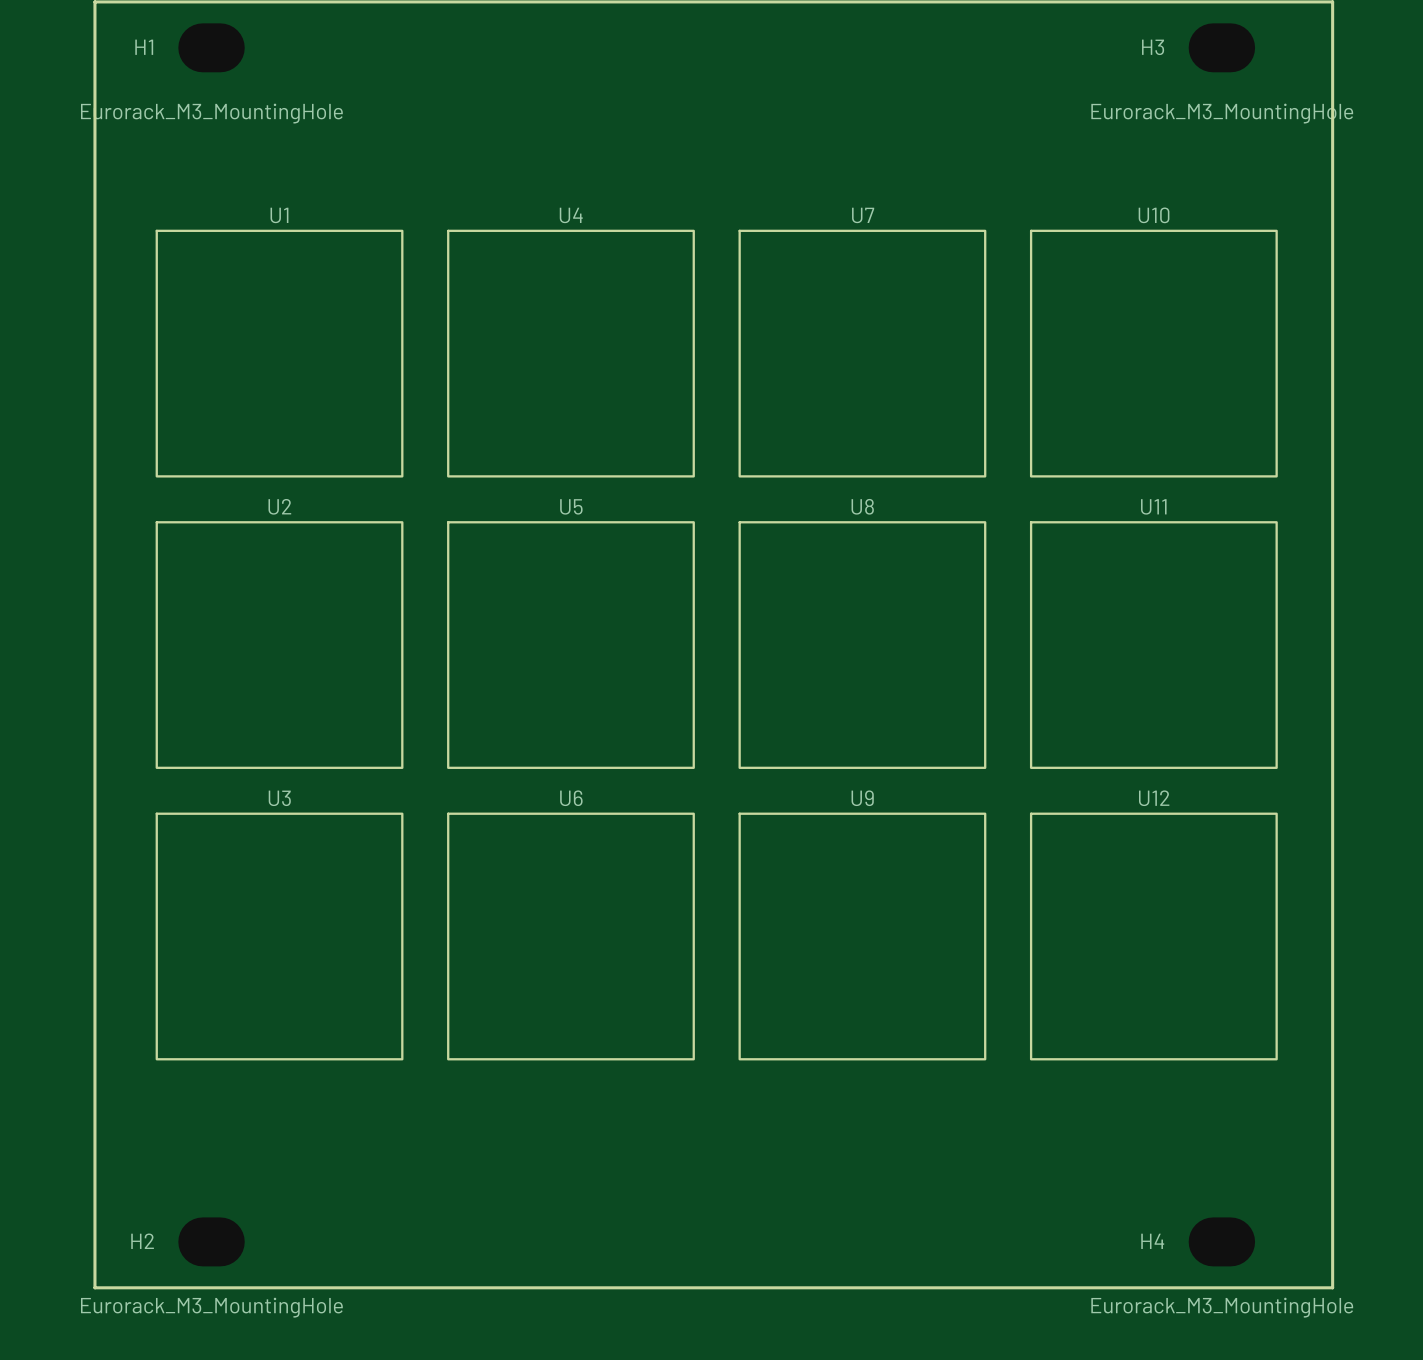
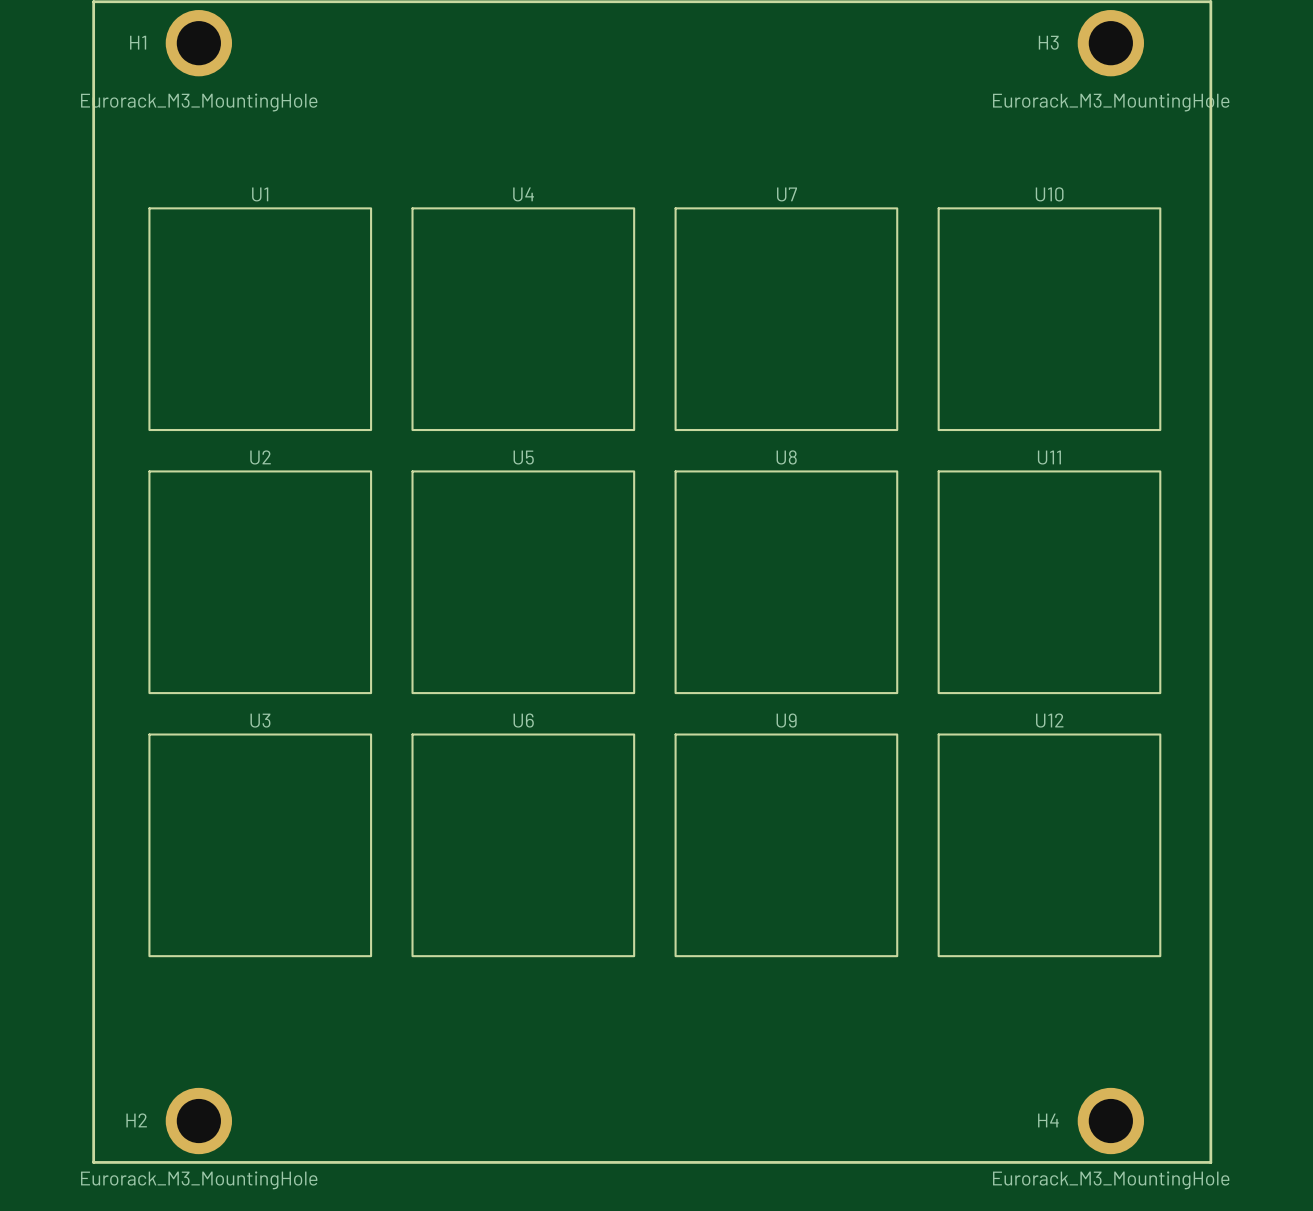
H1 footprint: [178, 23, 245, 73] -> [165, 10, 233, 77]
H3 footprint: [1188, 23, 1256, 73] -> [1077, 10, 1145, 77]
H2 footprint: [178, 1217, 245, 1267] -> [165, 1087, 233, 1155]
H4 footprint: [1188, 1217, 1256, 1267] -> [1077, 1087, 1145, 1155]

